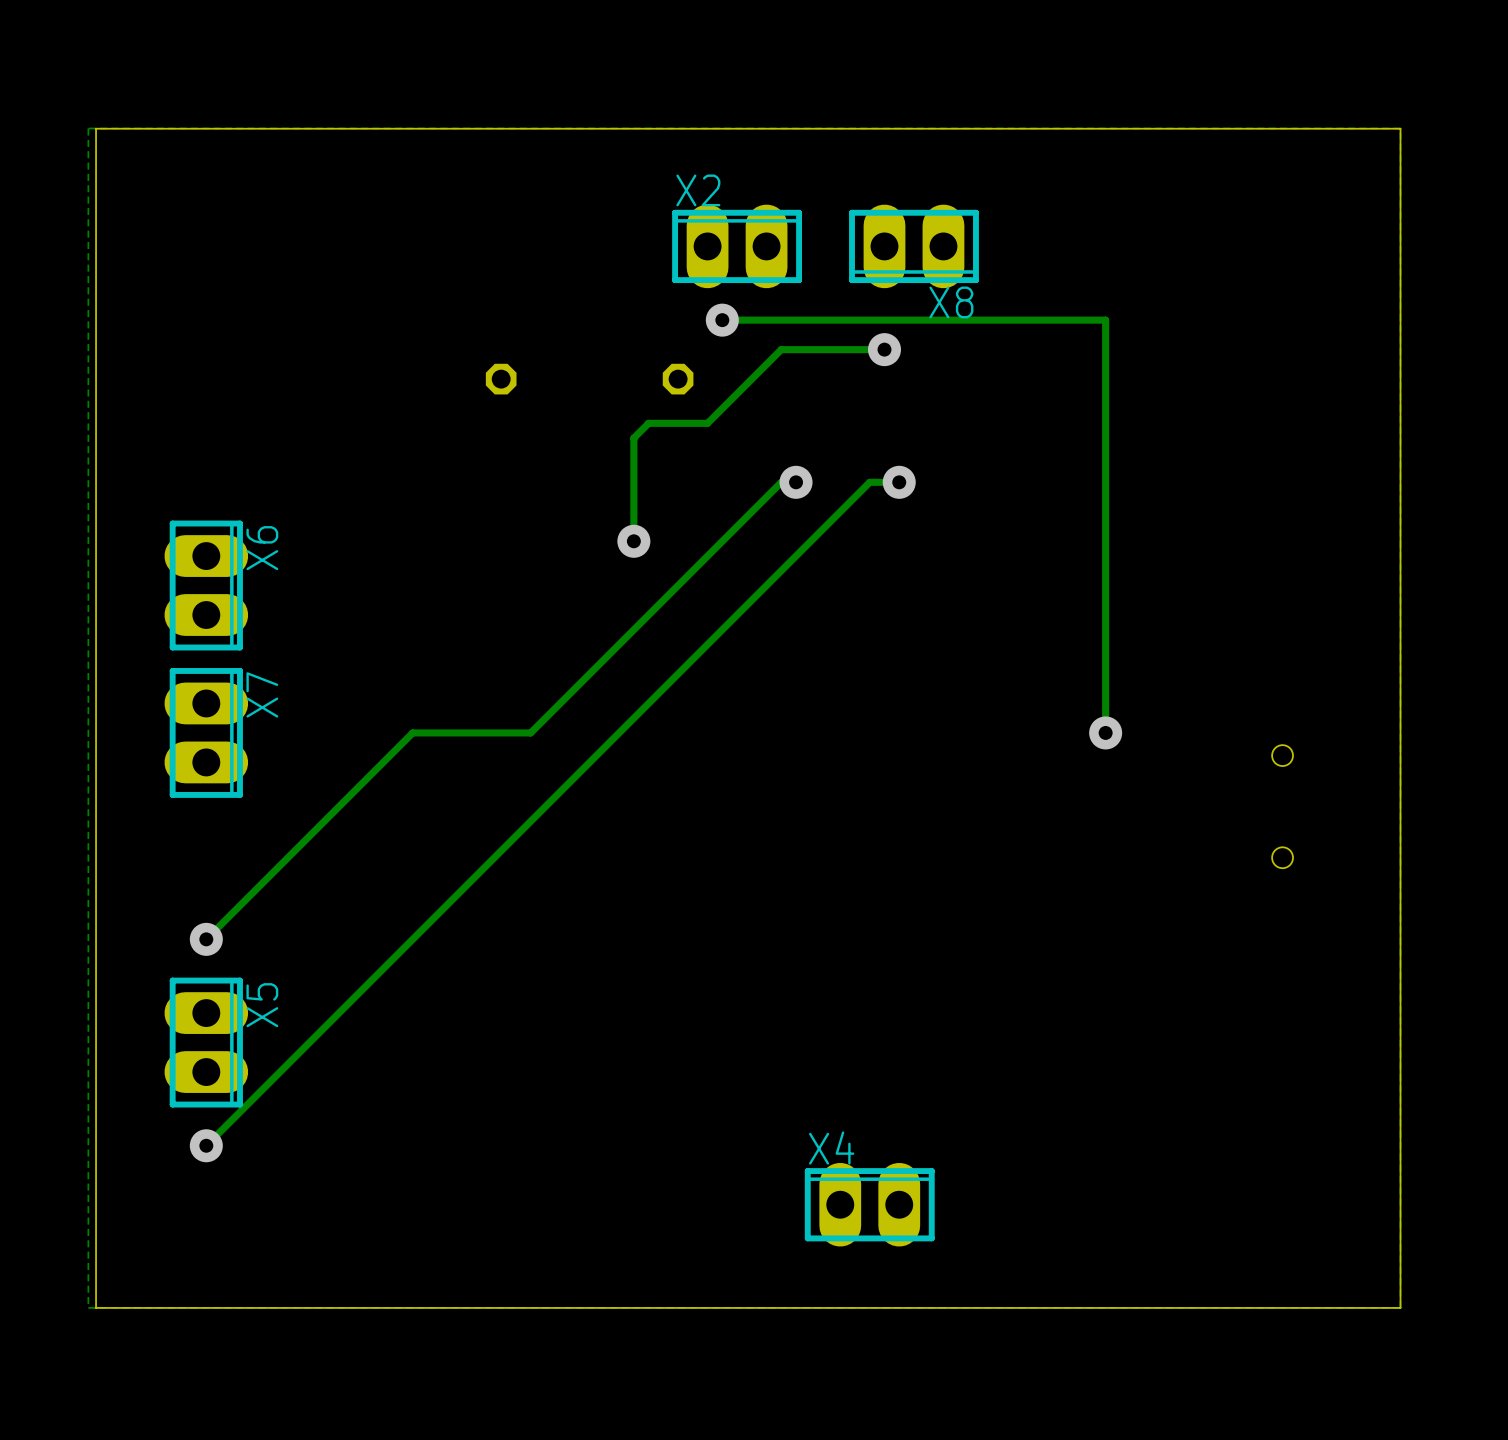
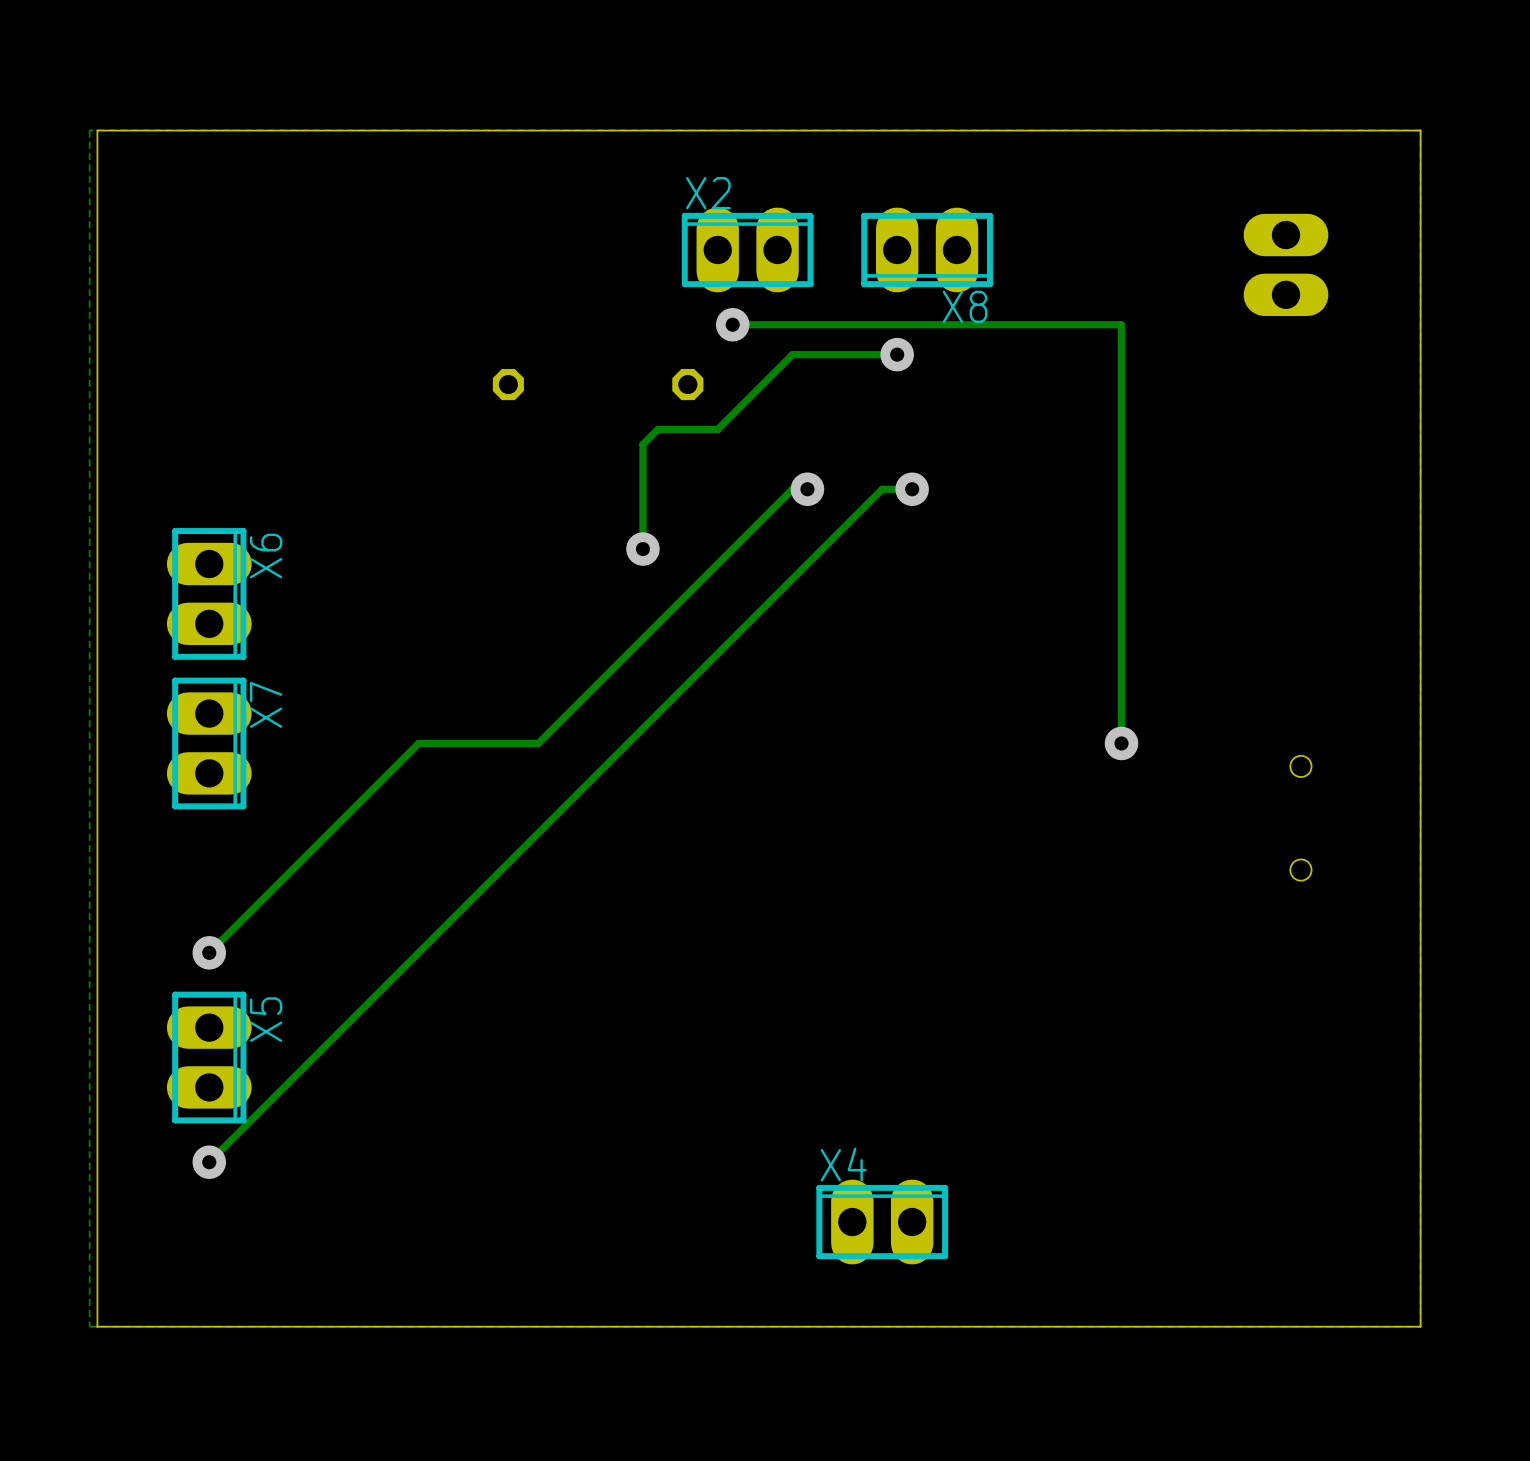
part: none -> (1286, 264)

